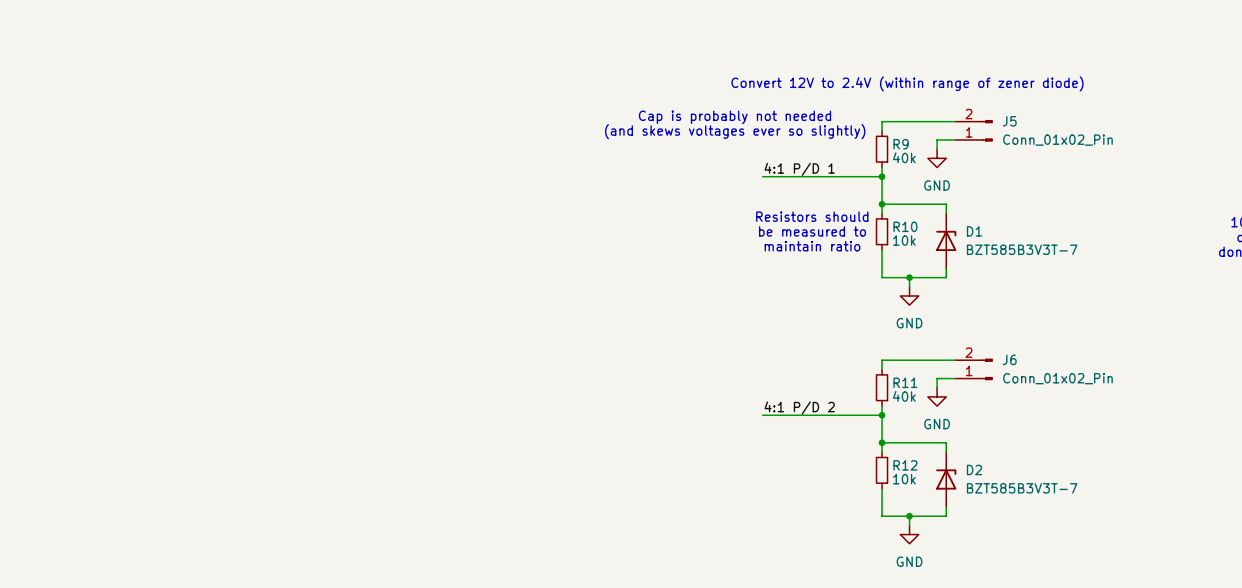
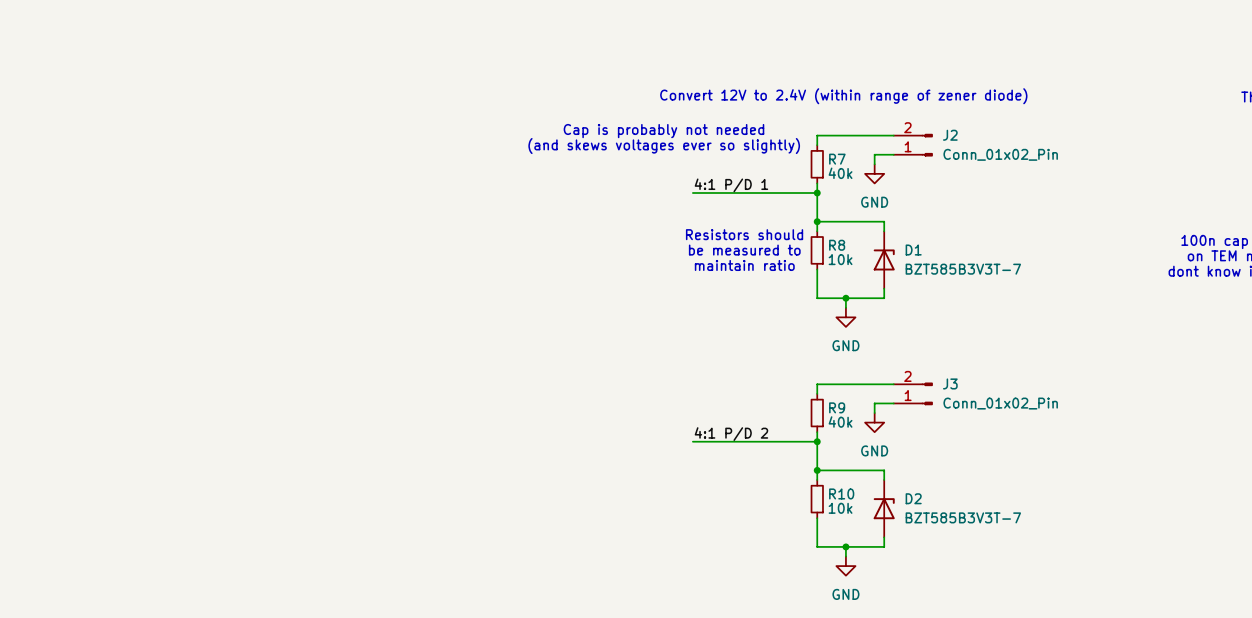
J5 name: J5 (1009, 121) -> J2 (950, 135)
R9 name: R9 (901, 144) -> R7 (837, 159)
R10 name: R10 (905, 226) -> R8 (837, 245)
J6 name: J6 (1009, 359) -> J3 (950, 383)
R11 name: R11 (905, 382) -> R9 (837, 407)
R12 name: R12 (905, 465) -> R10 (841, 493)

